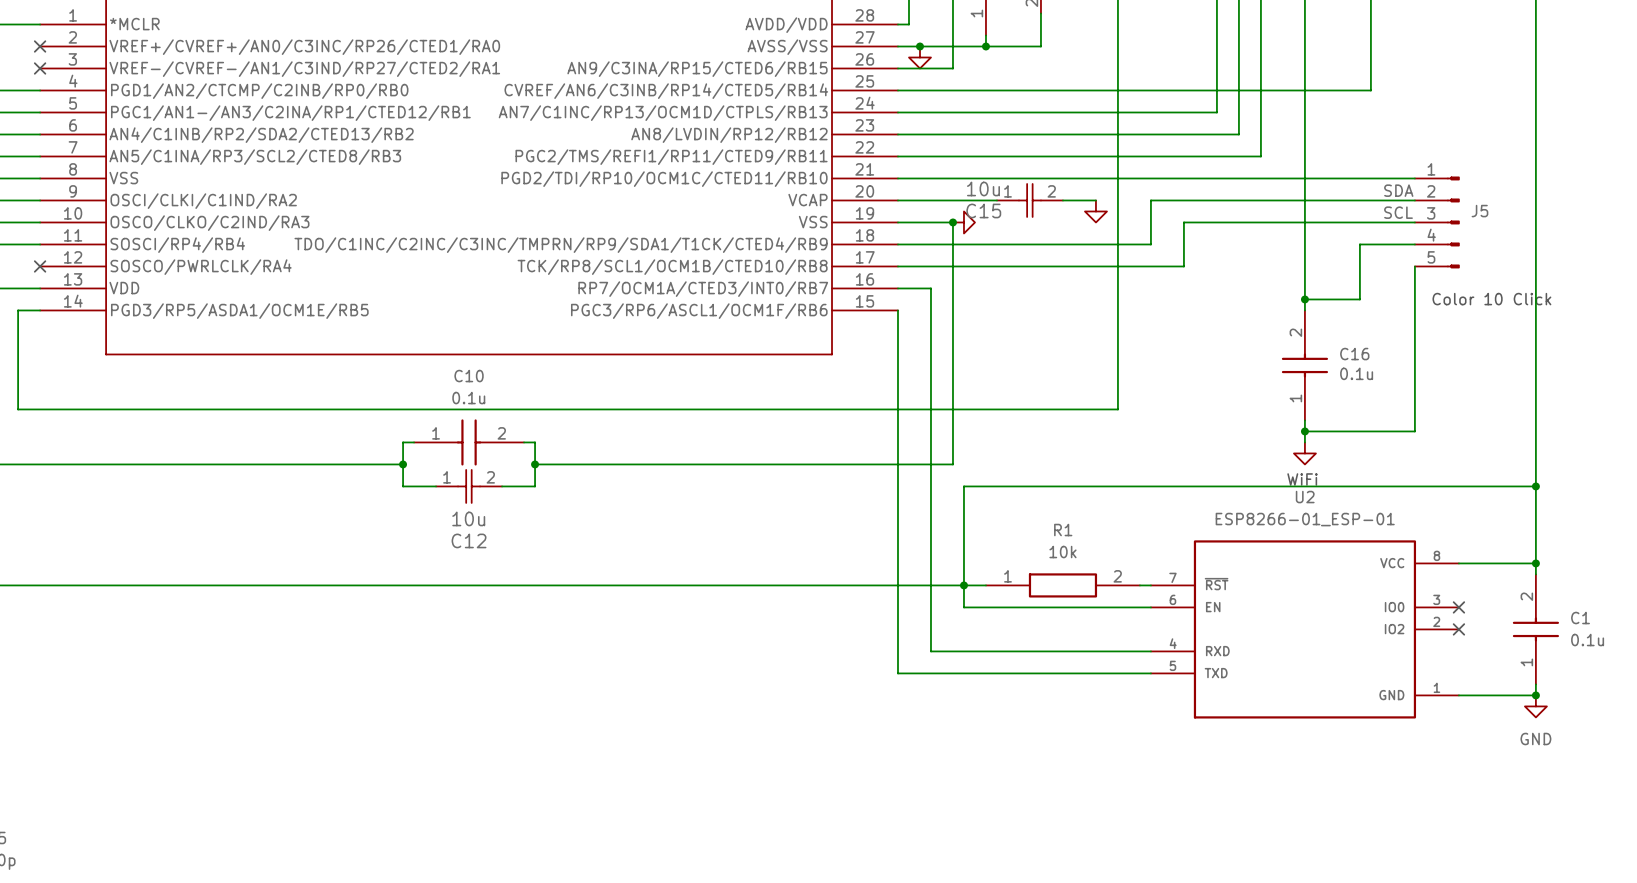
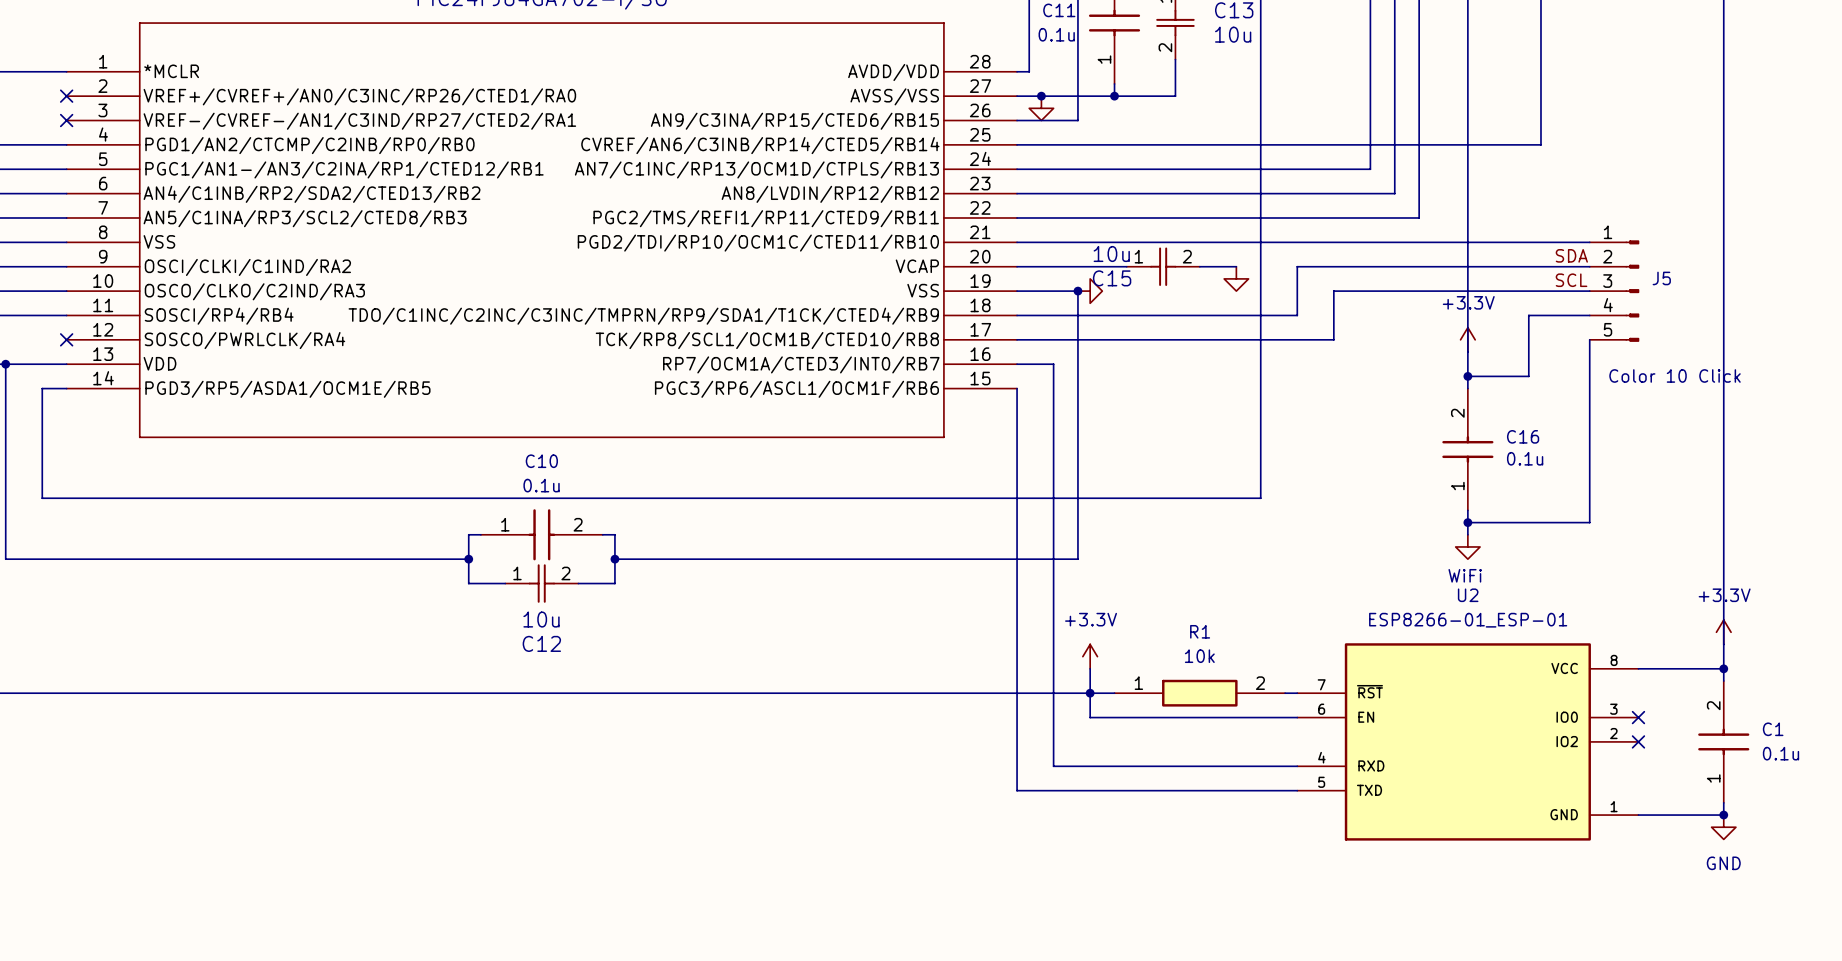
power symbol: none -> +3.3V (1467, 339)
wire: (1535, 486) (963, 486) (963, 563) -> none
junction: (1535, 486) -> none
power symbol: none -> +3.3V (1723, 632)
power symbol: none -> +3.3V (1090, 656)

